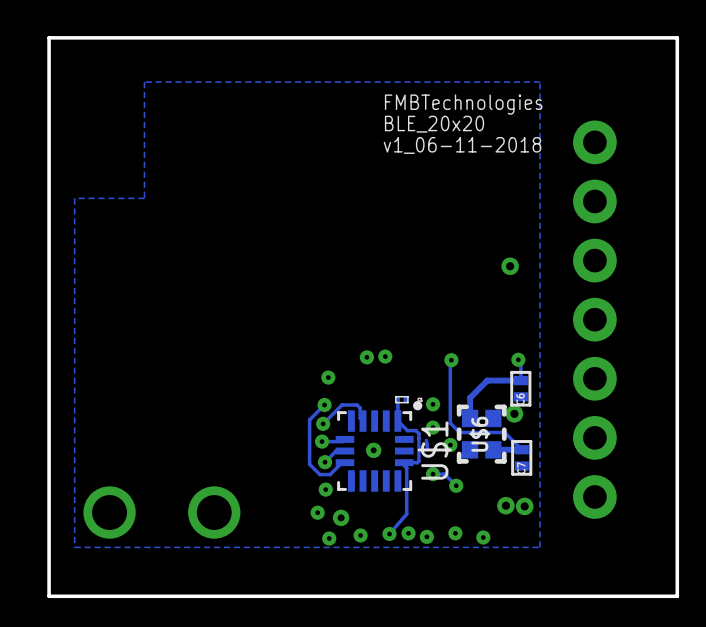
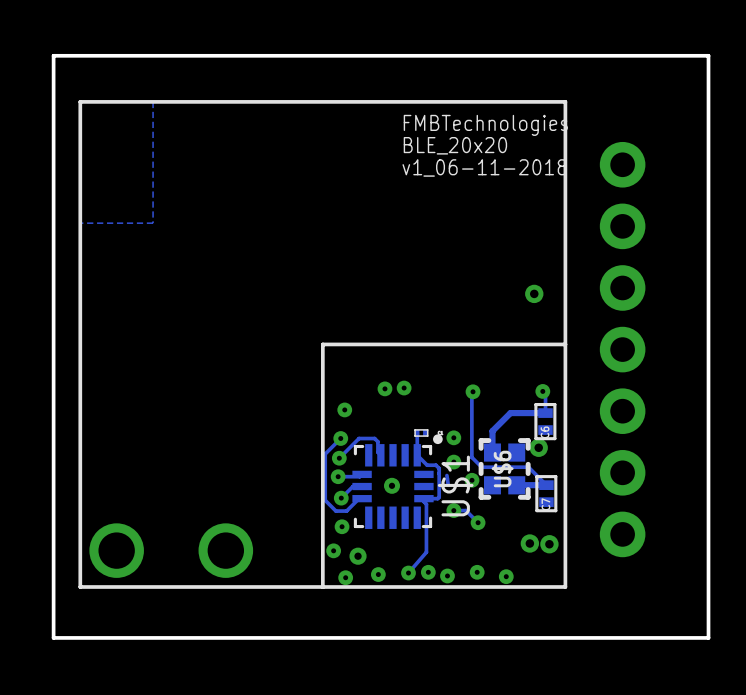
line: none -> (565, 101) (565, 587) (80, 587) (80, 101) (565, 101)
line: none -> (565, 344) (322, 344) (322, 587)

